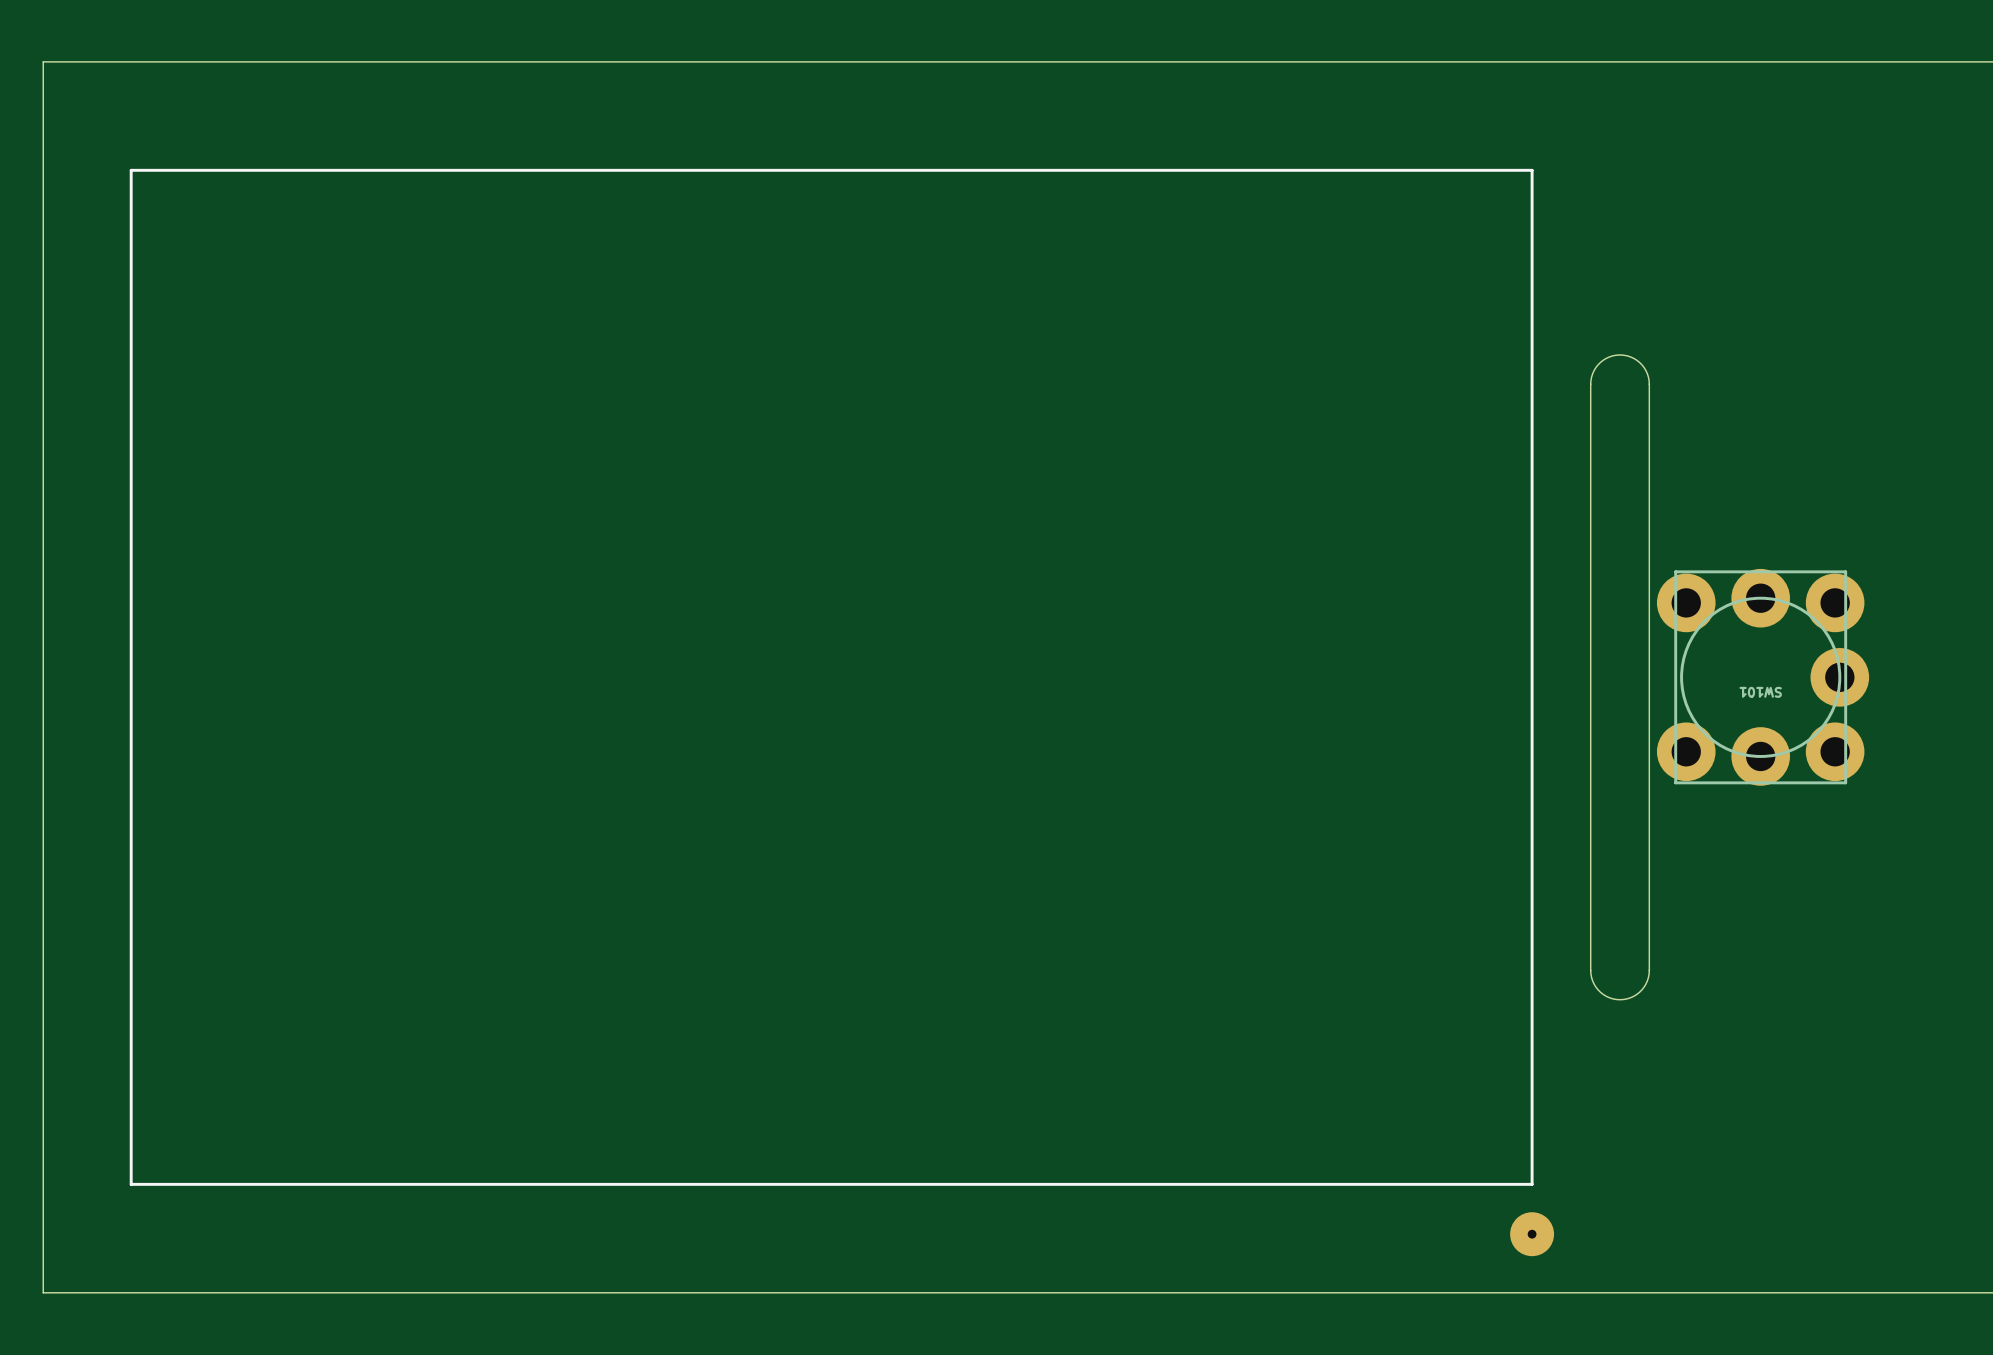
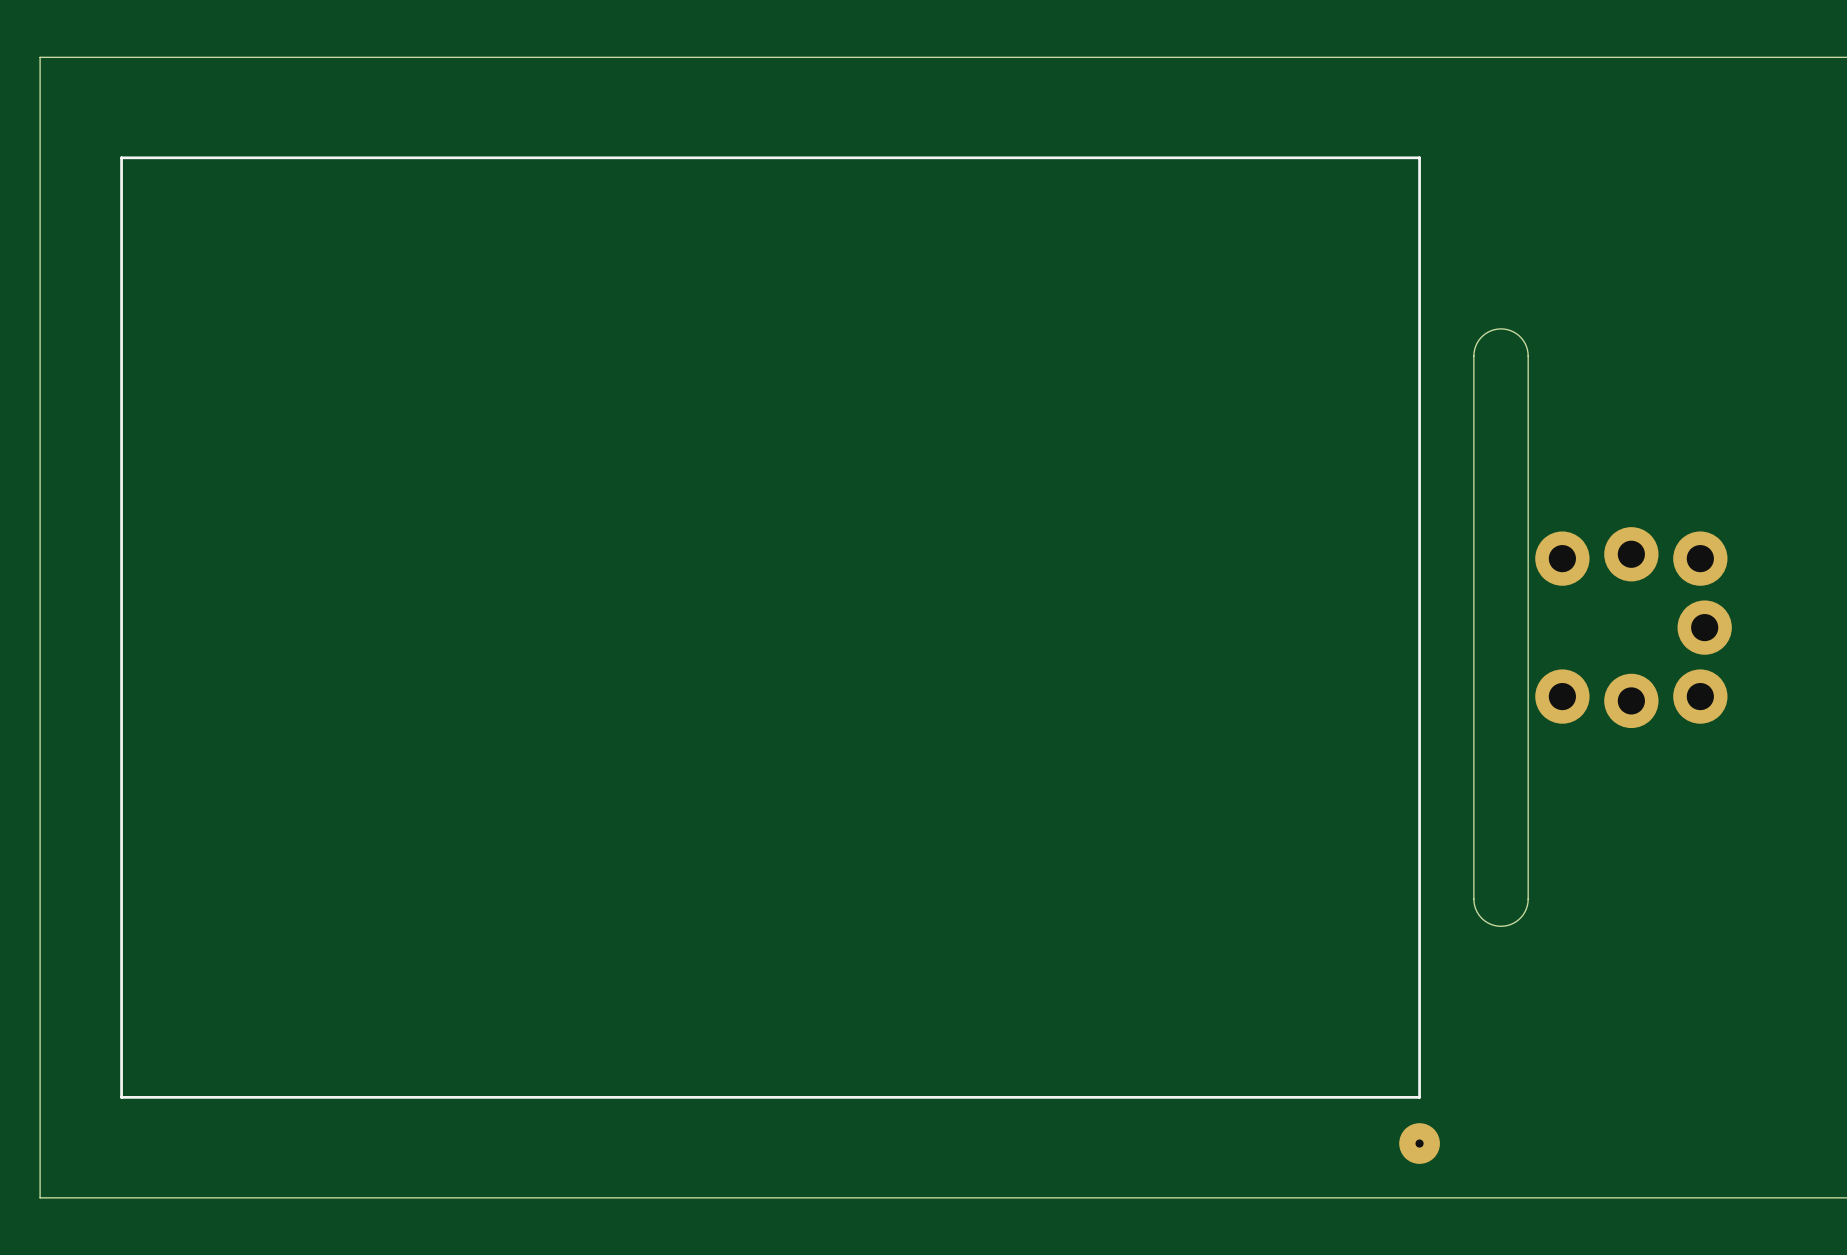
SW101 side: bottom (1763, 677) -> top (1633, 627)

